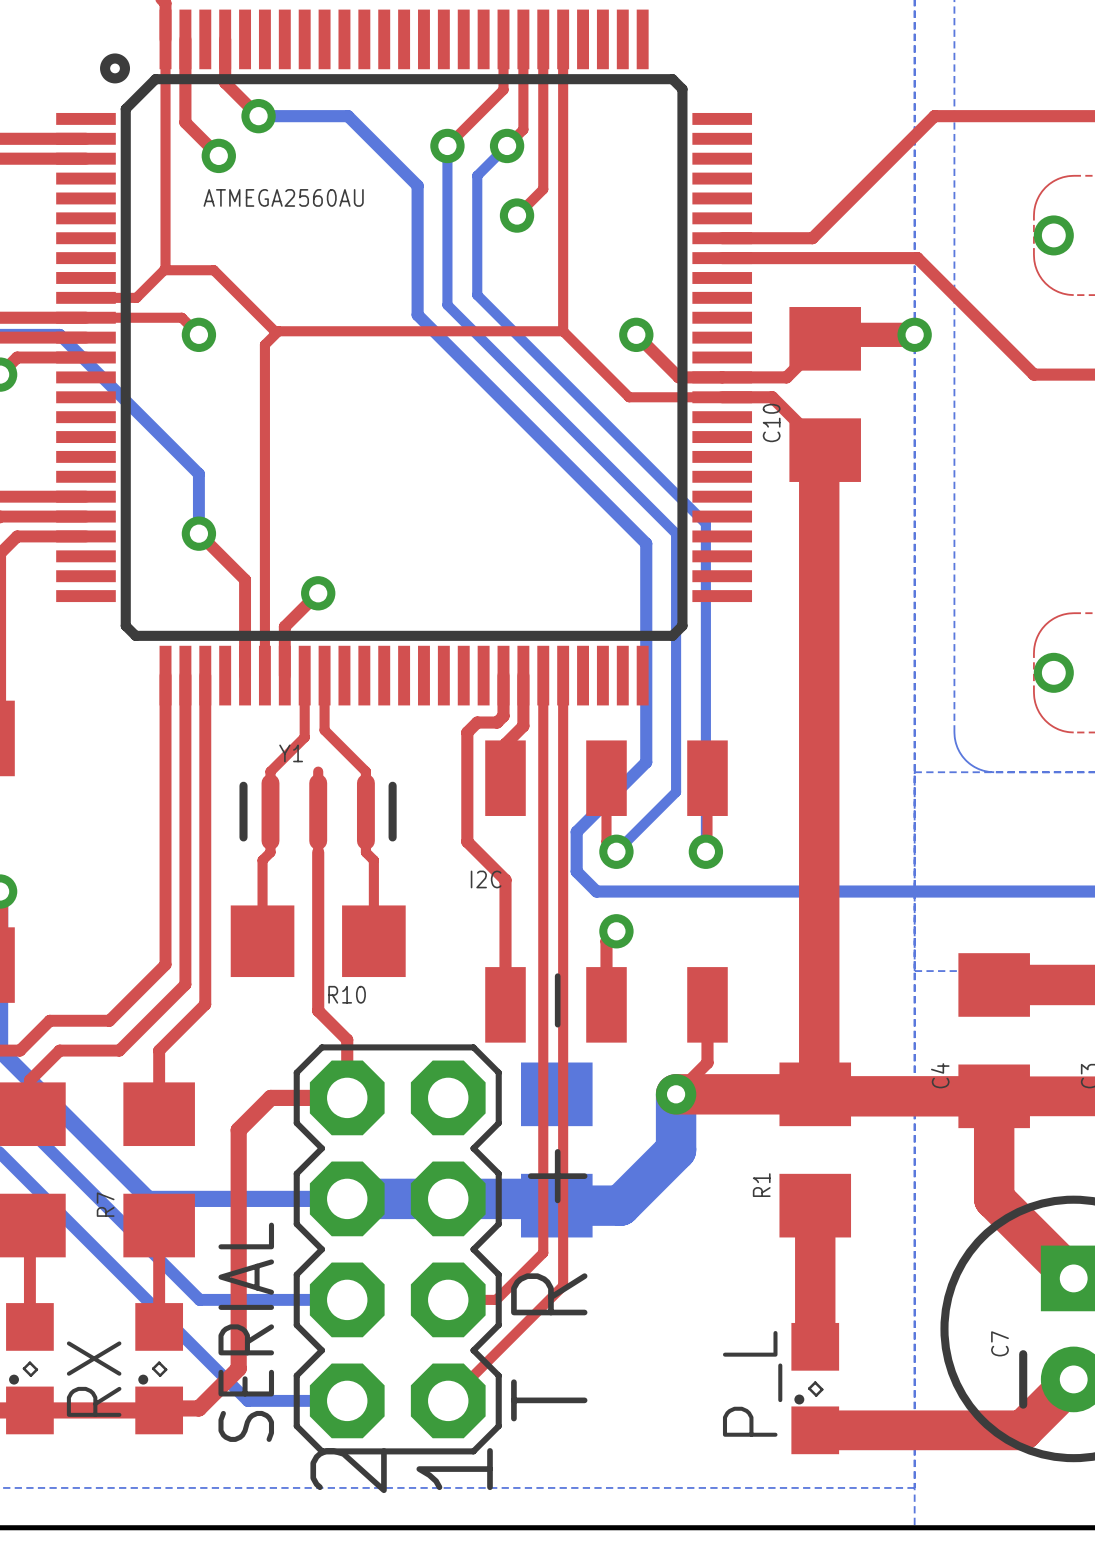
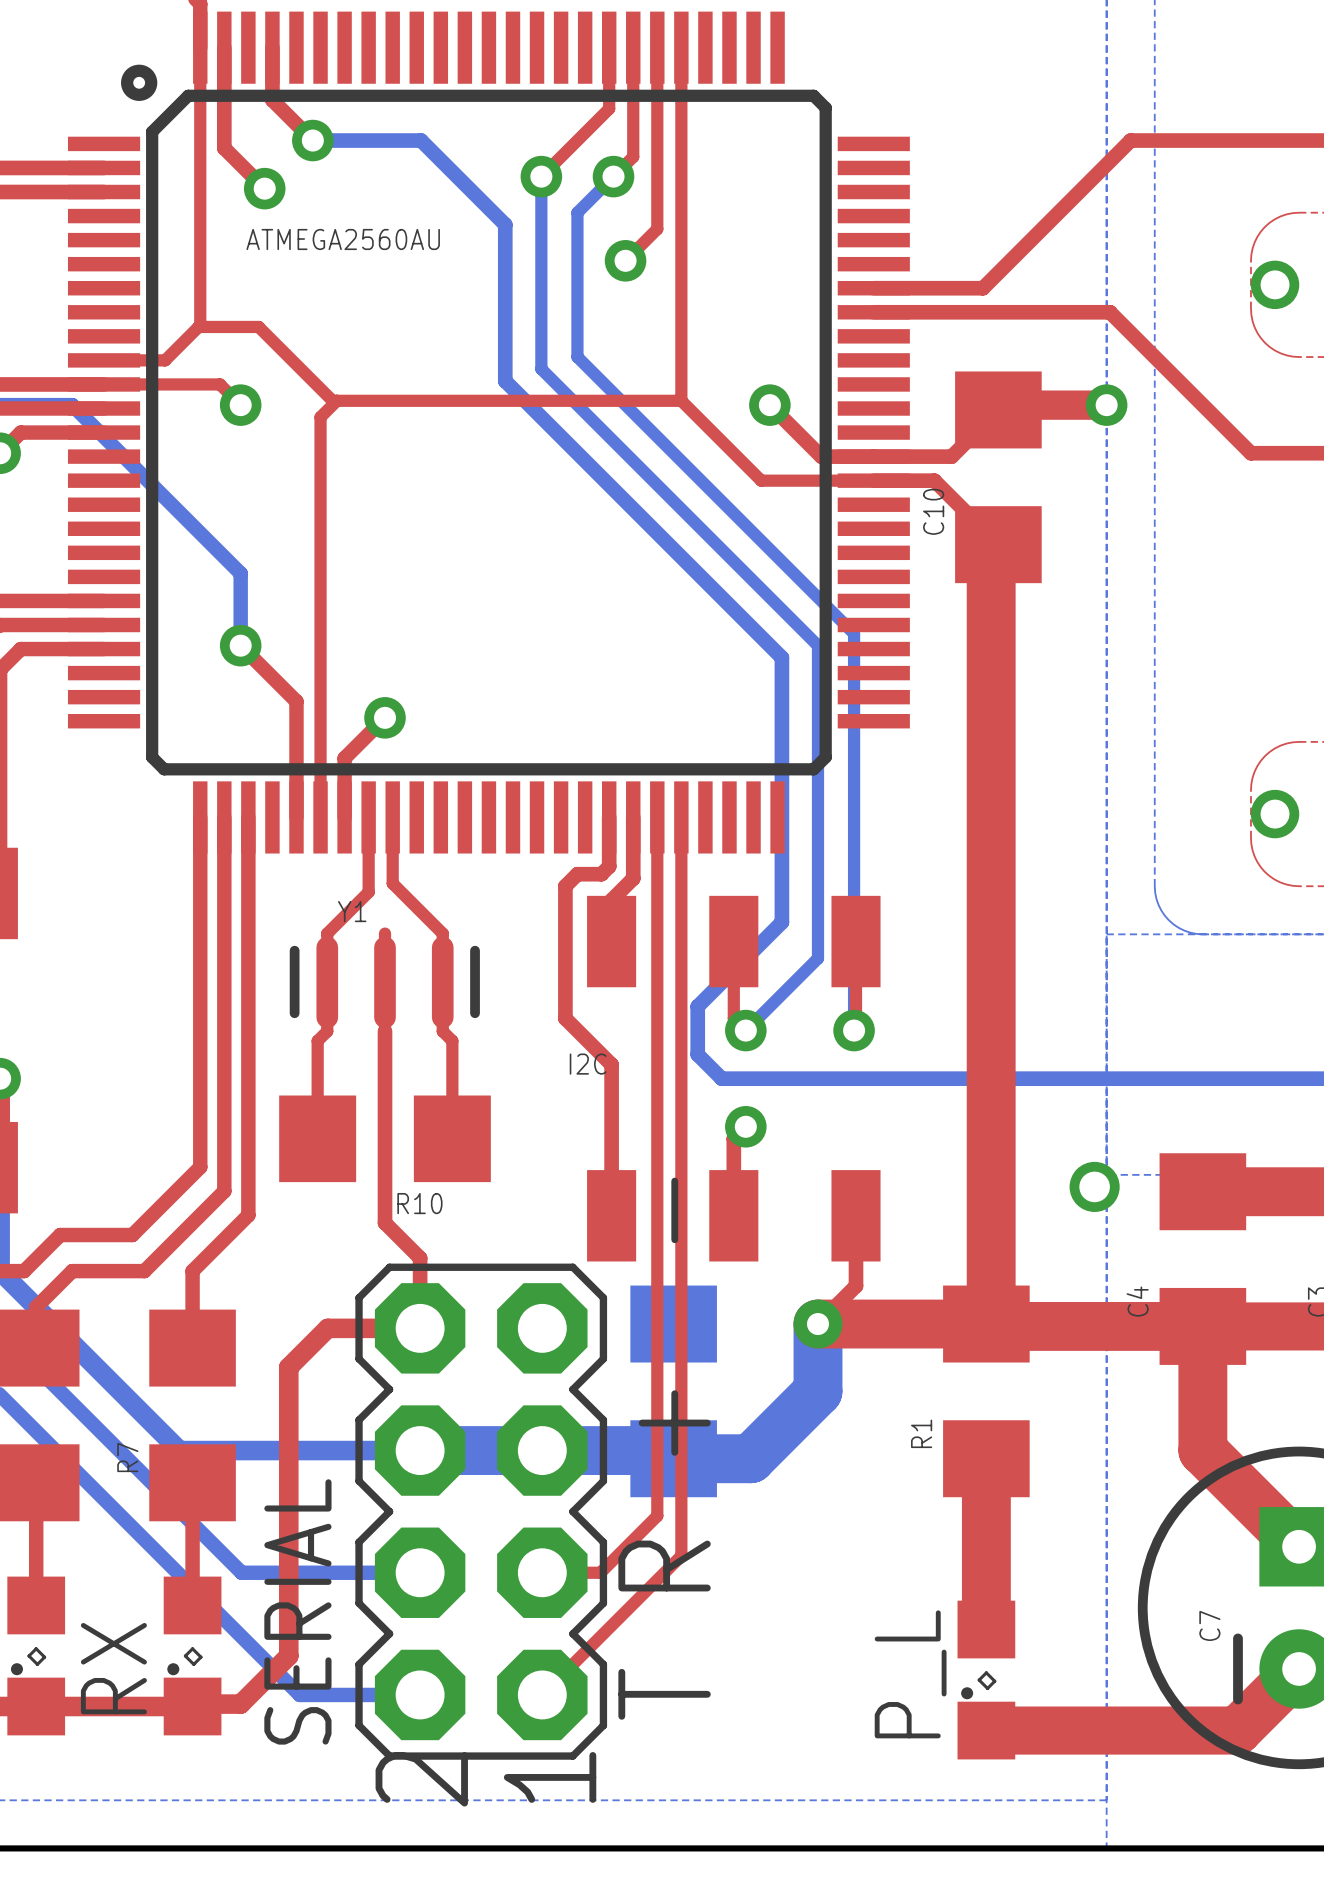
via: none -> (1094, 1186)

